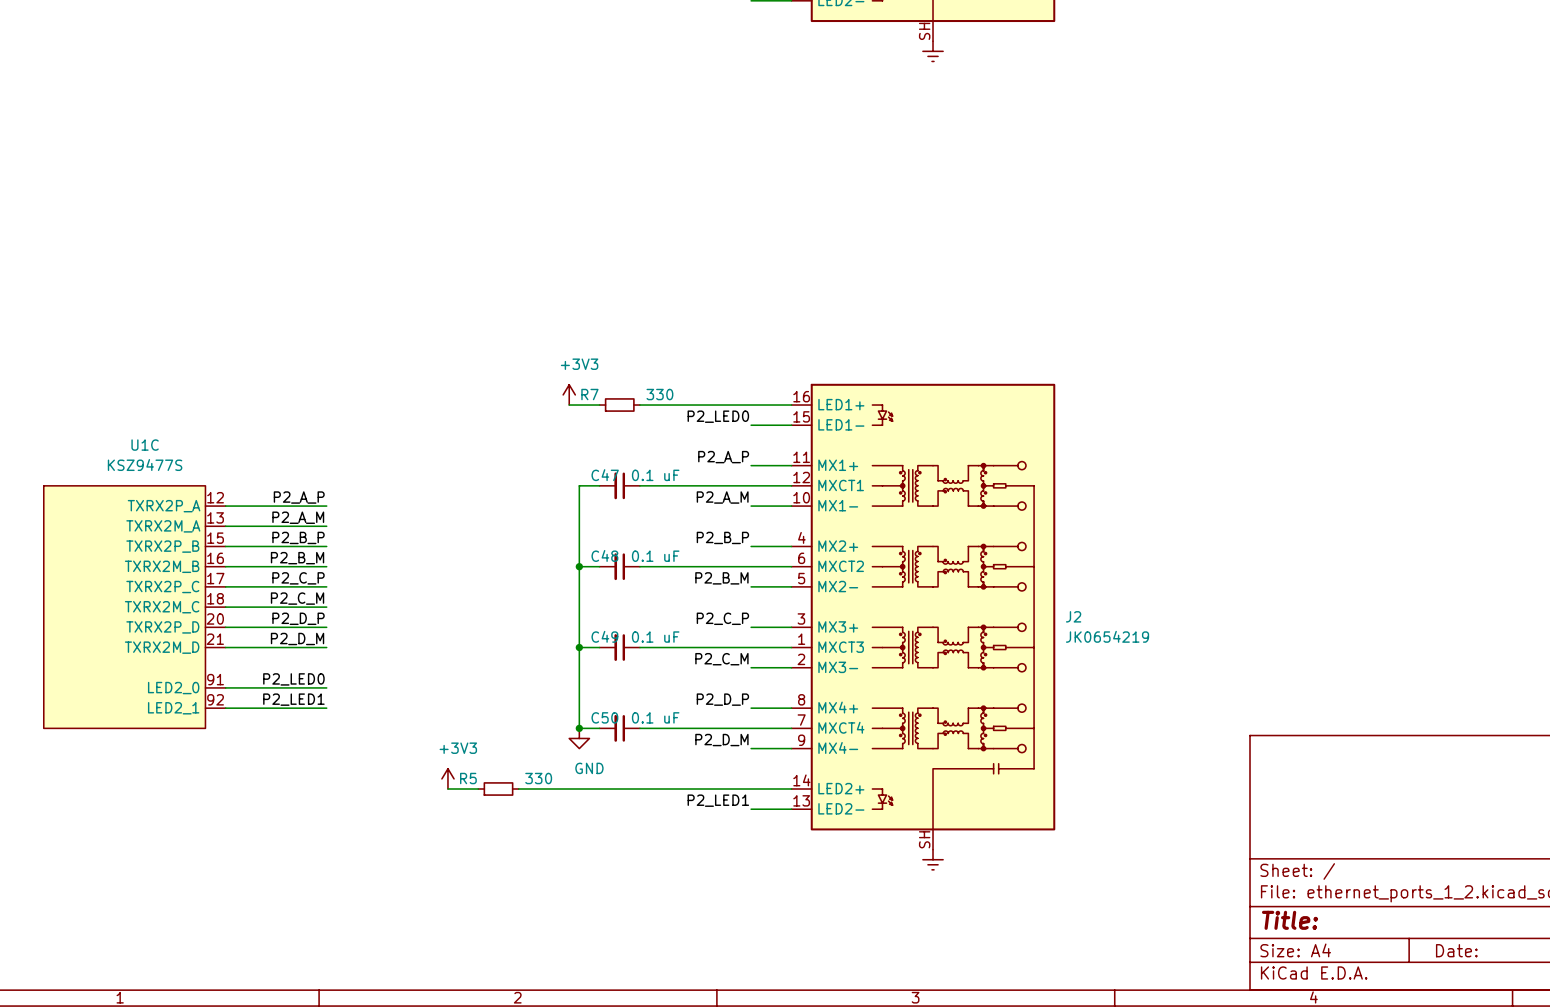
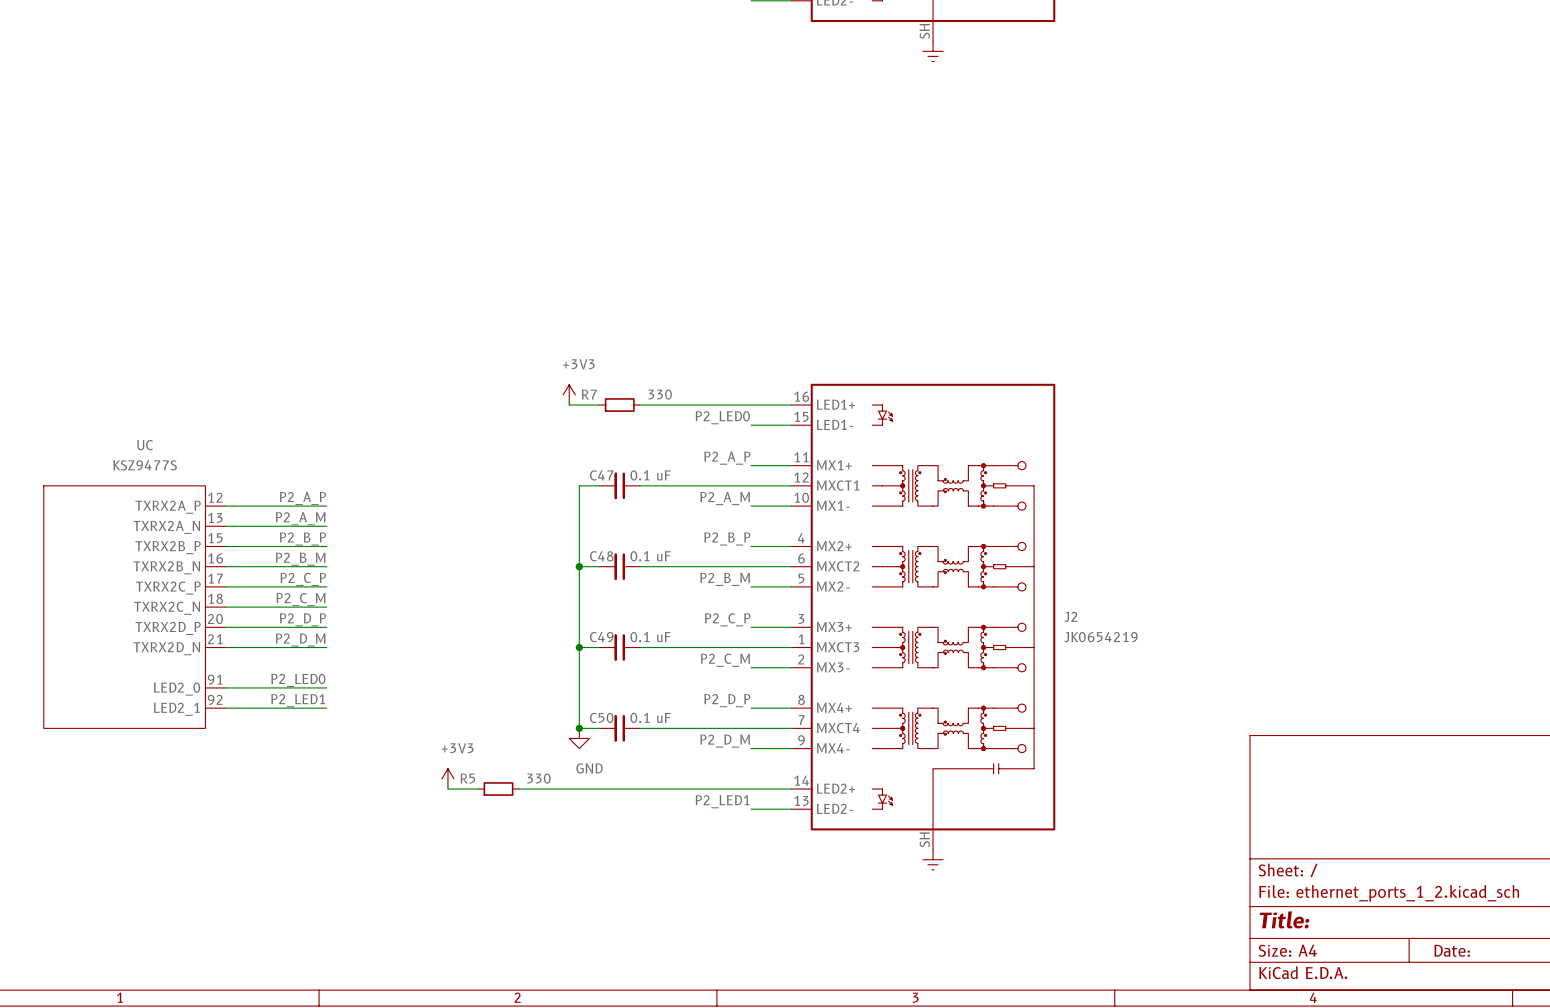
U1C name: U1C (145, 445) -> UC (145, 445)
U1C pin name: TXRX2P_A (164, 506) -> TXRX2A_P (168, 507)
U1C pin name: TXRX2M_A (163, 526) -> TXRX2A_N (166, 527)
U1C pin name: TXRX2P_B (162, 546) -> TXRX2B_P (168, 547)
U1C pin name: TXRX2M_B (162, 566) -> TXRX2B_N (166, 567)
U1C pin name: TXRX2P_C (162, 587) -> TXRX2C_P (168, 588)
U1C pin name: TXRX2M_C (162, 607) -> TXRX2C_N (167, 608)
U1C pin name: TXRX2P_D (162, 627) -> TXRX2D_P (168, 628)
U1C pin name: TXRX2M_D (162, 647) -> TXRX2D_N (166, 648)

